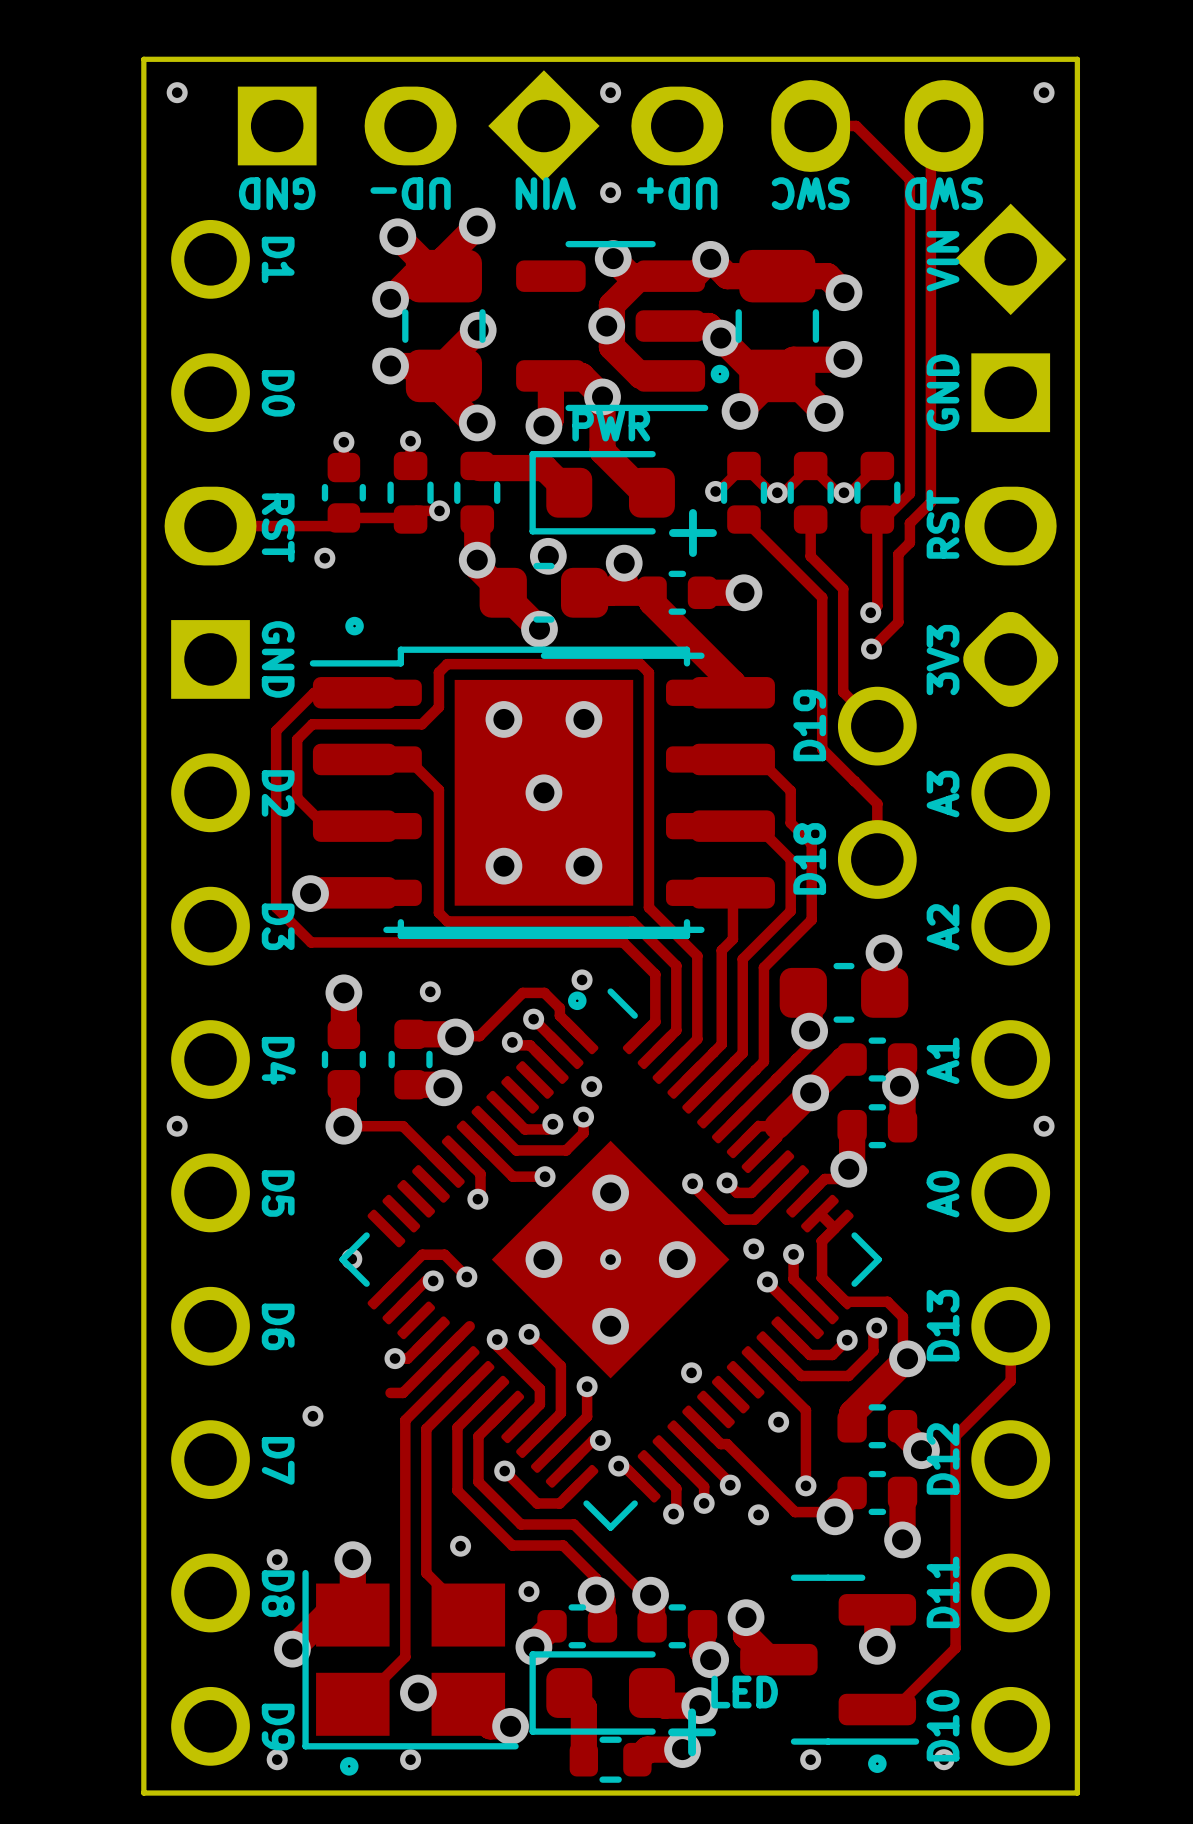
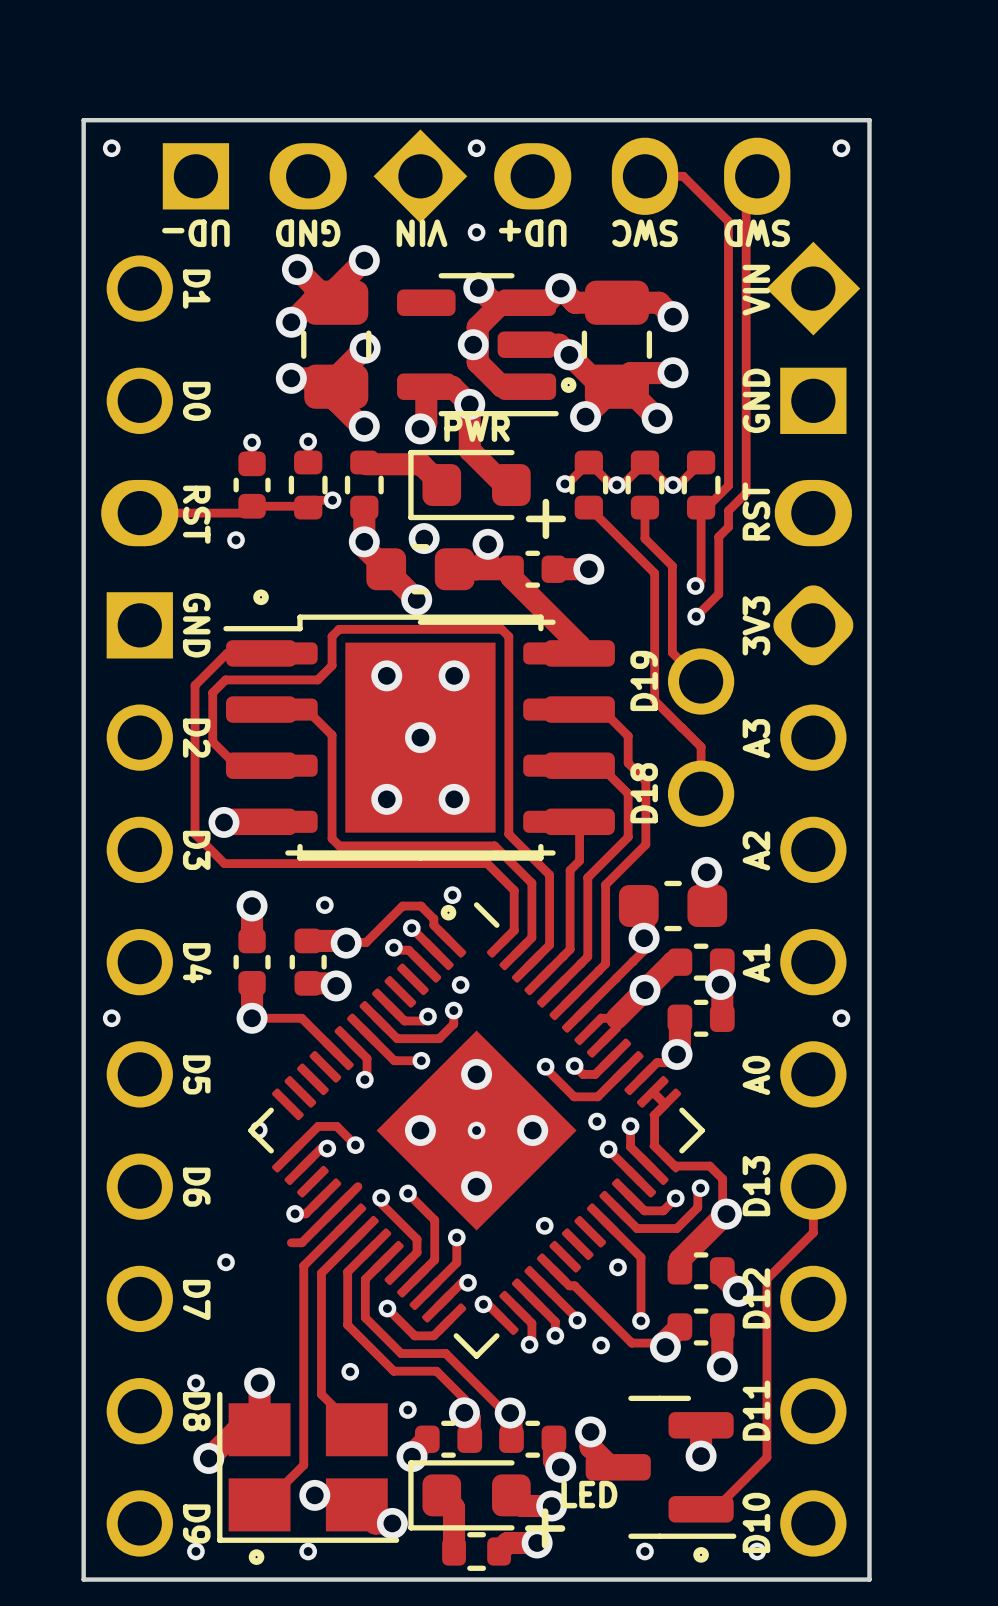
text: GND (277, 193) -> UD- (195, 233)
text: UD- (410, 193) -> GND (308, 233)

